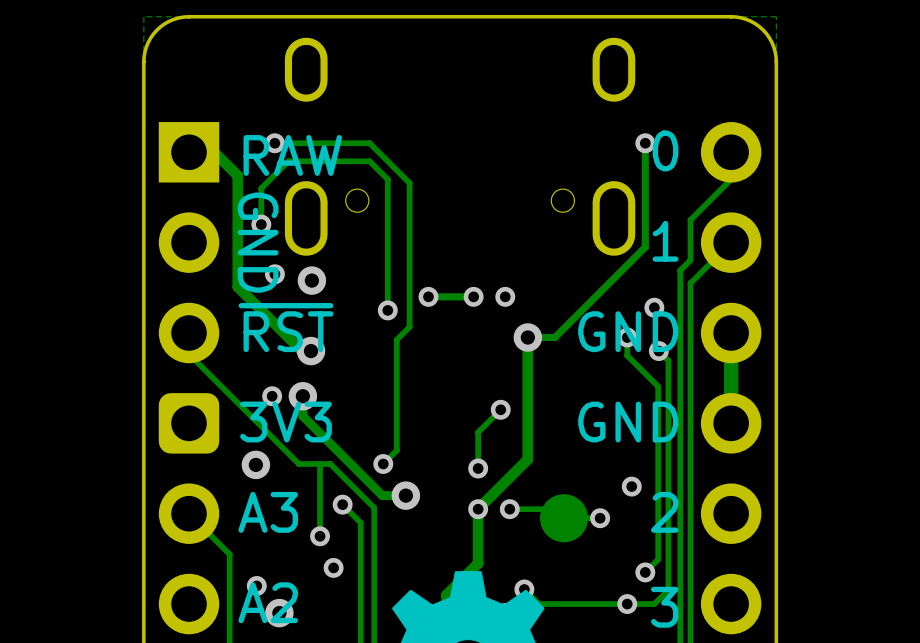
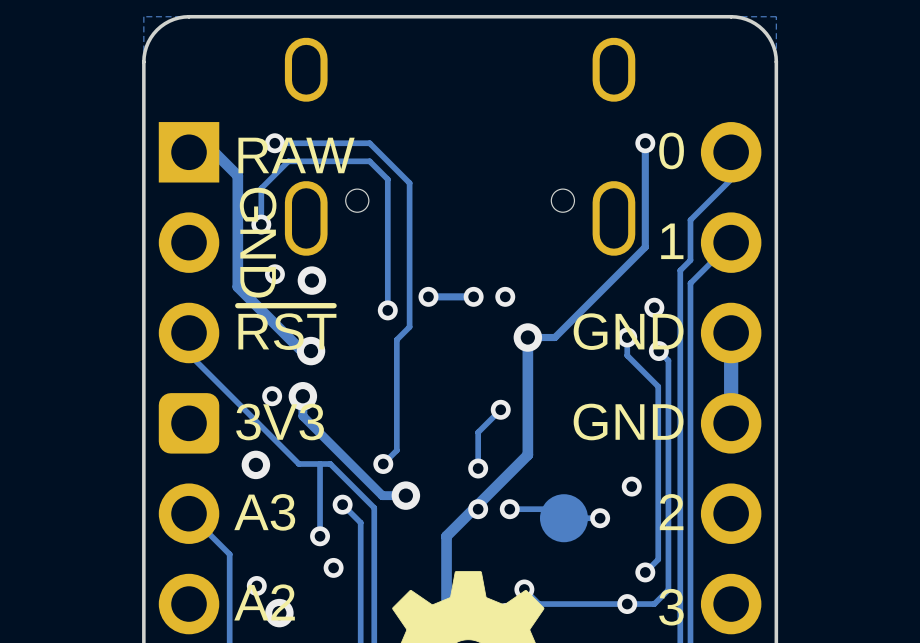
track: (527, 454) (527, 459) (478, 509) (478, 563) (446, 595) -> (527, 454) (446, 536) (446, 595)

